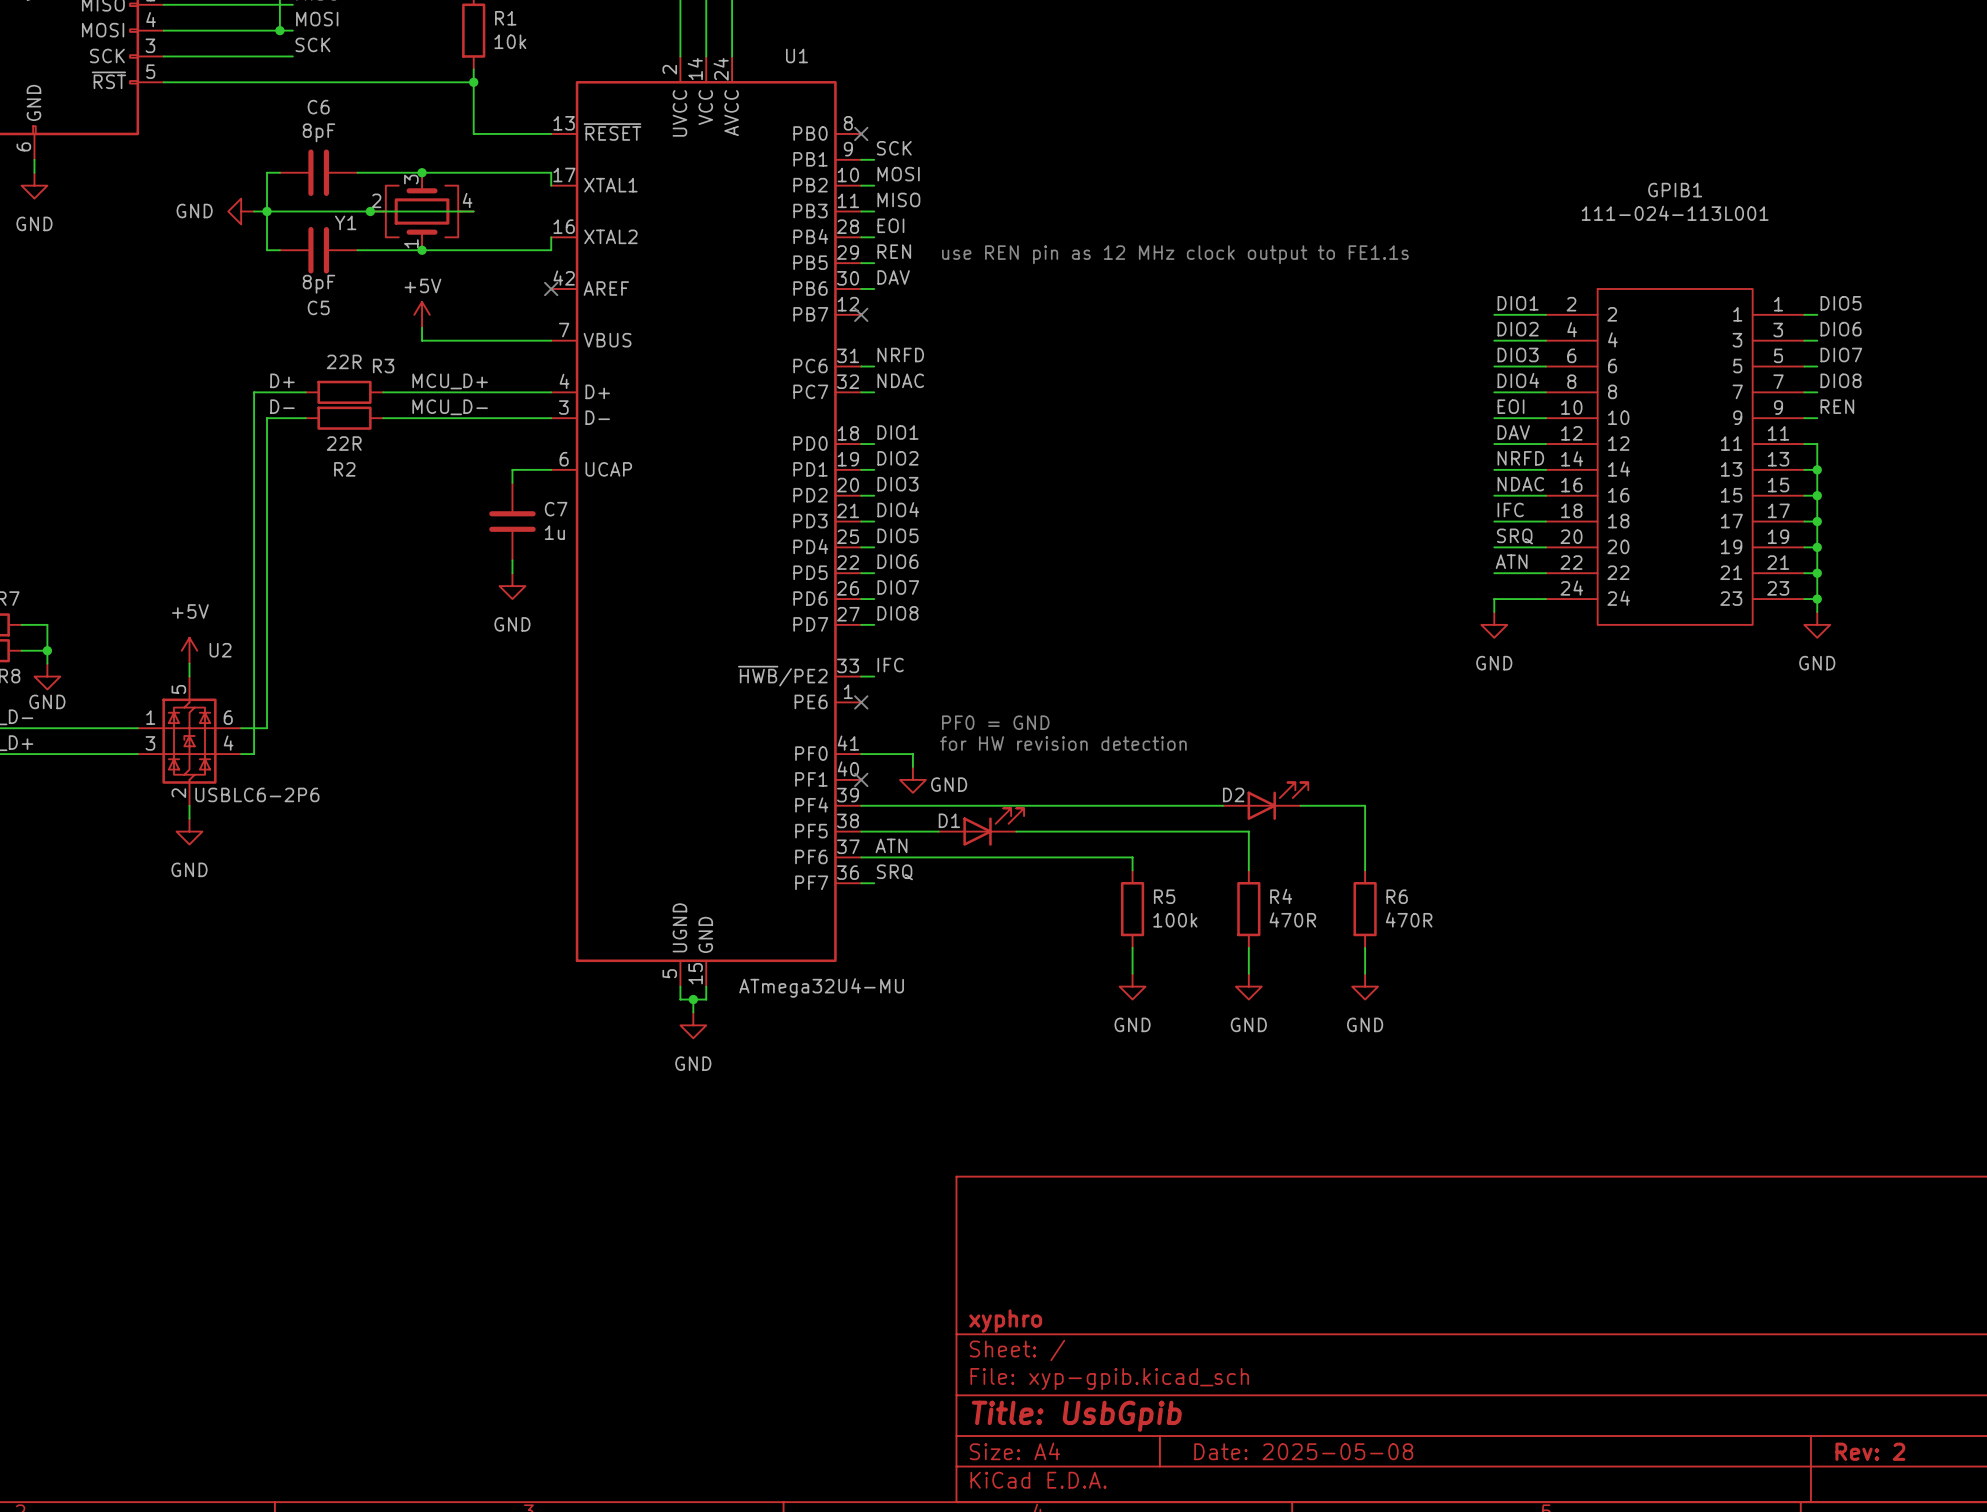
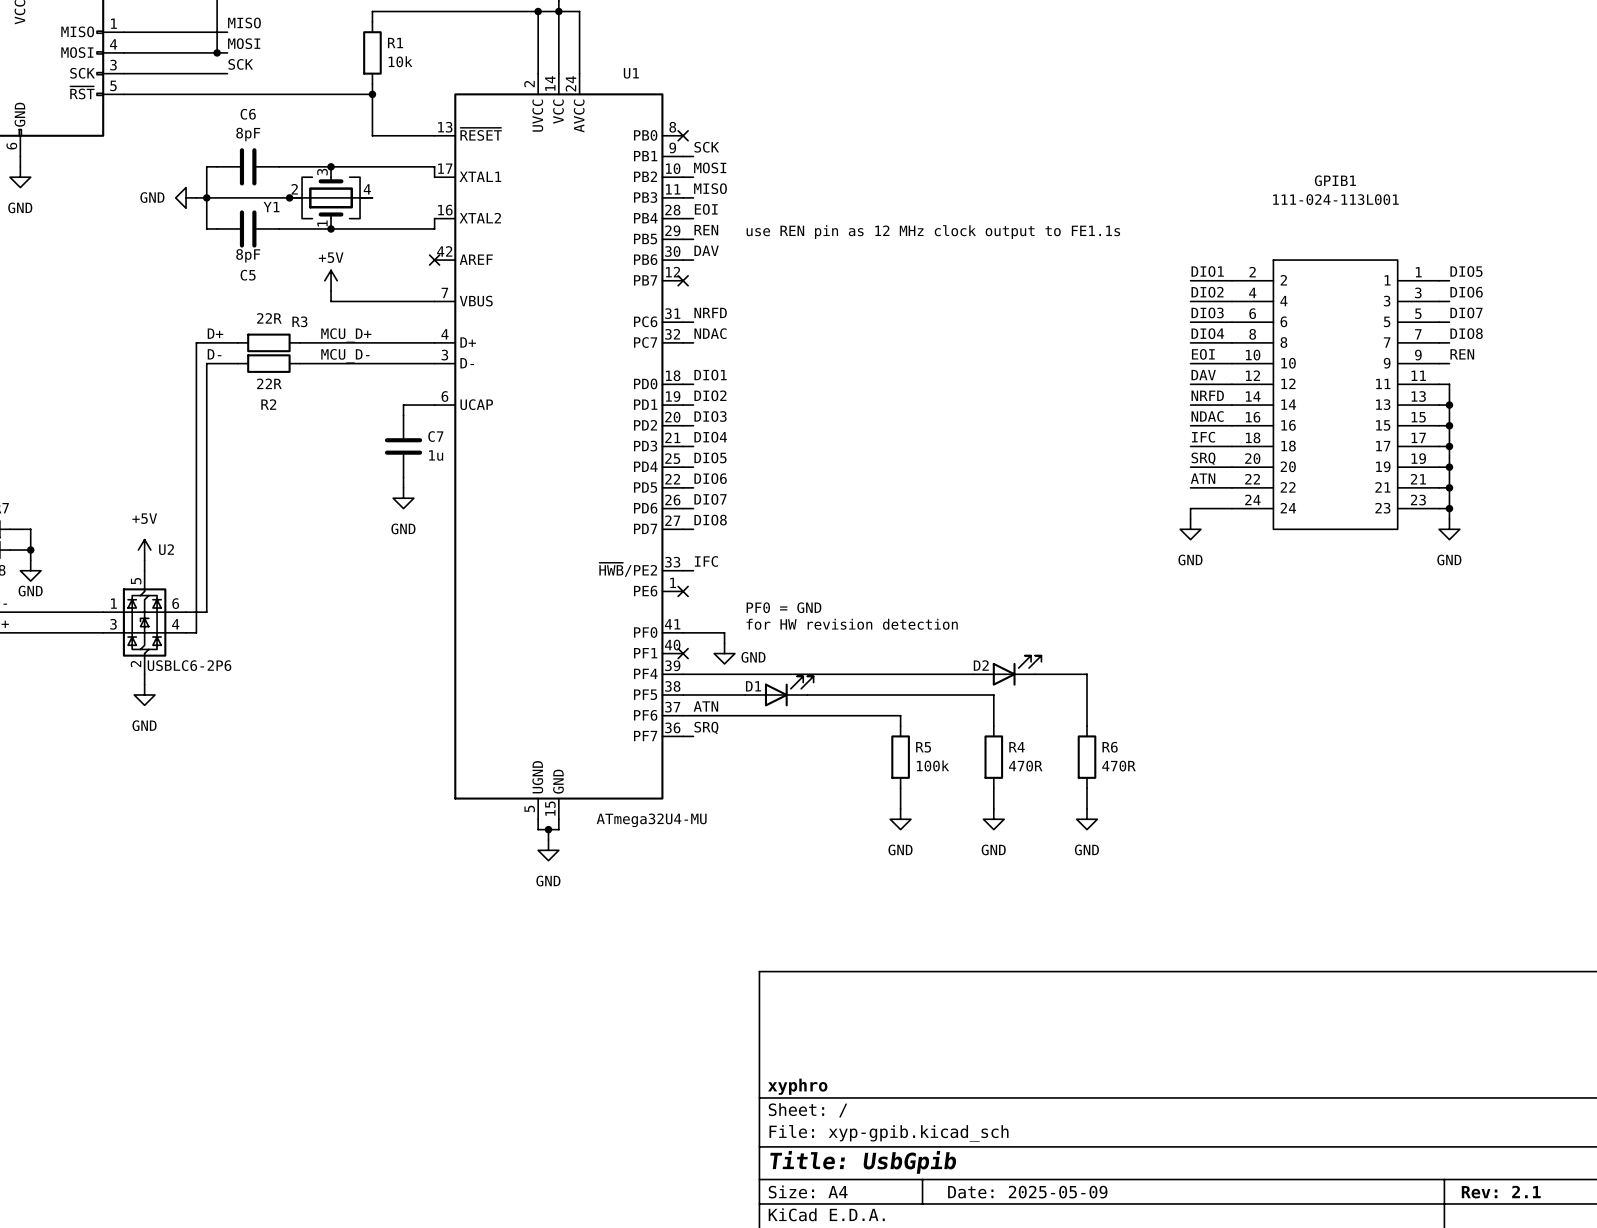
title block: Date: 2025-05-08 (1303, 1451) -> Date: 2025-05-09 (1027, 1192)
title block: Rev: 2 (1870, 1451) -> Rev: 2.1 (1501, 1192)

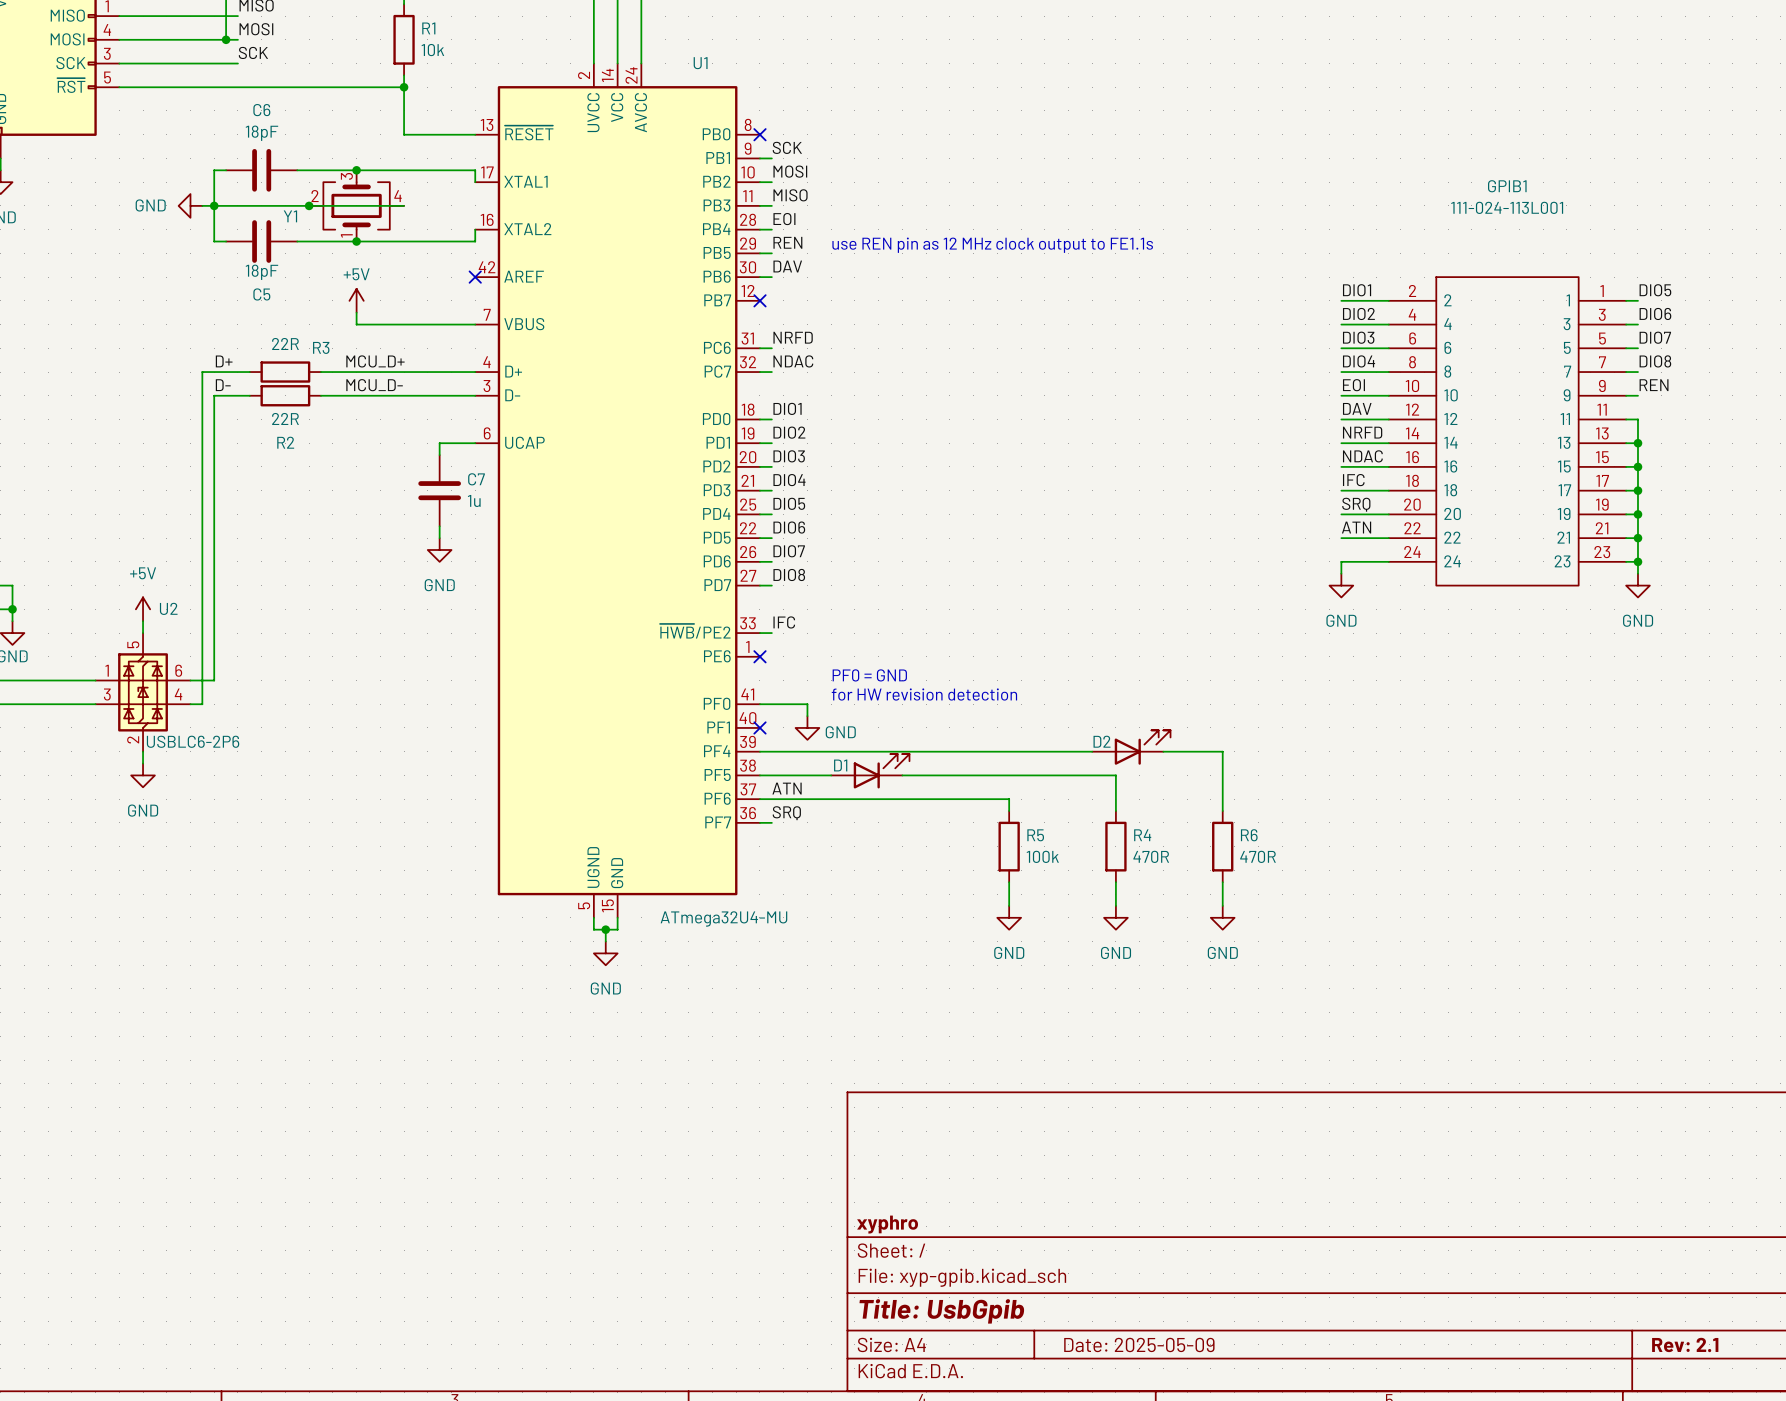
C6 value: 8pF (248, 134) -> 18pF (261, 133)
C5 value: 8pF (248, 255) -> 18pF (261, 272)

